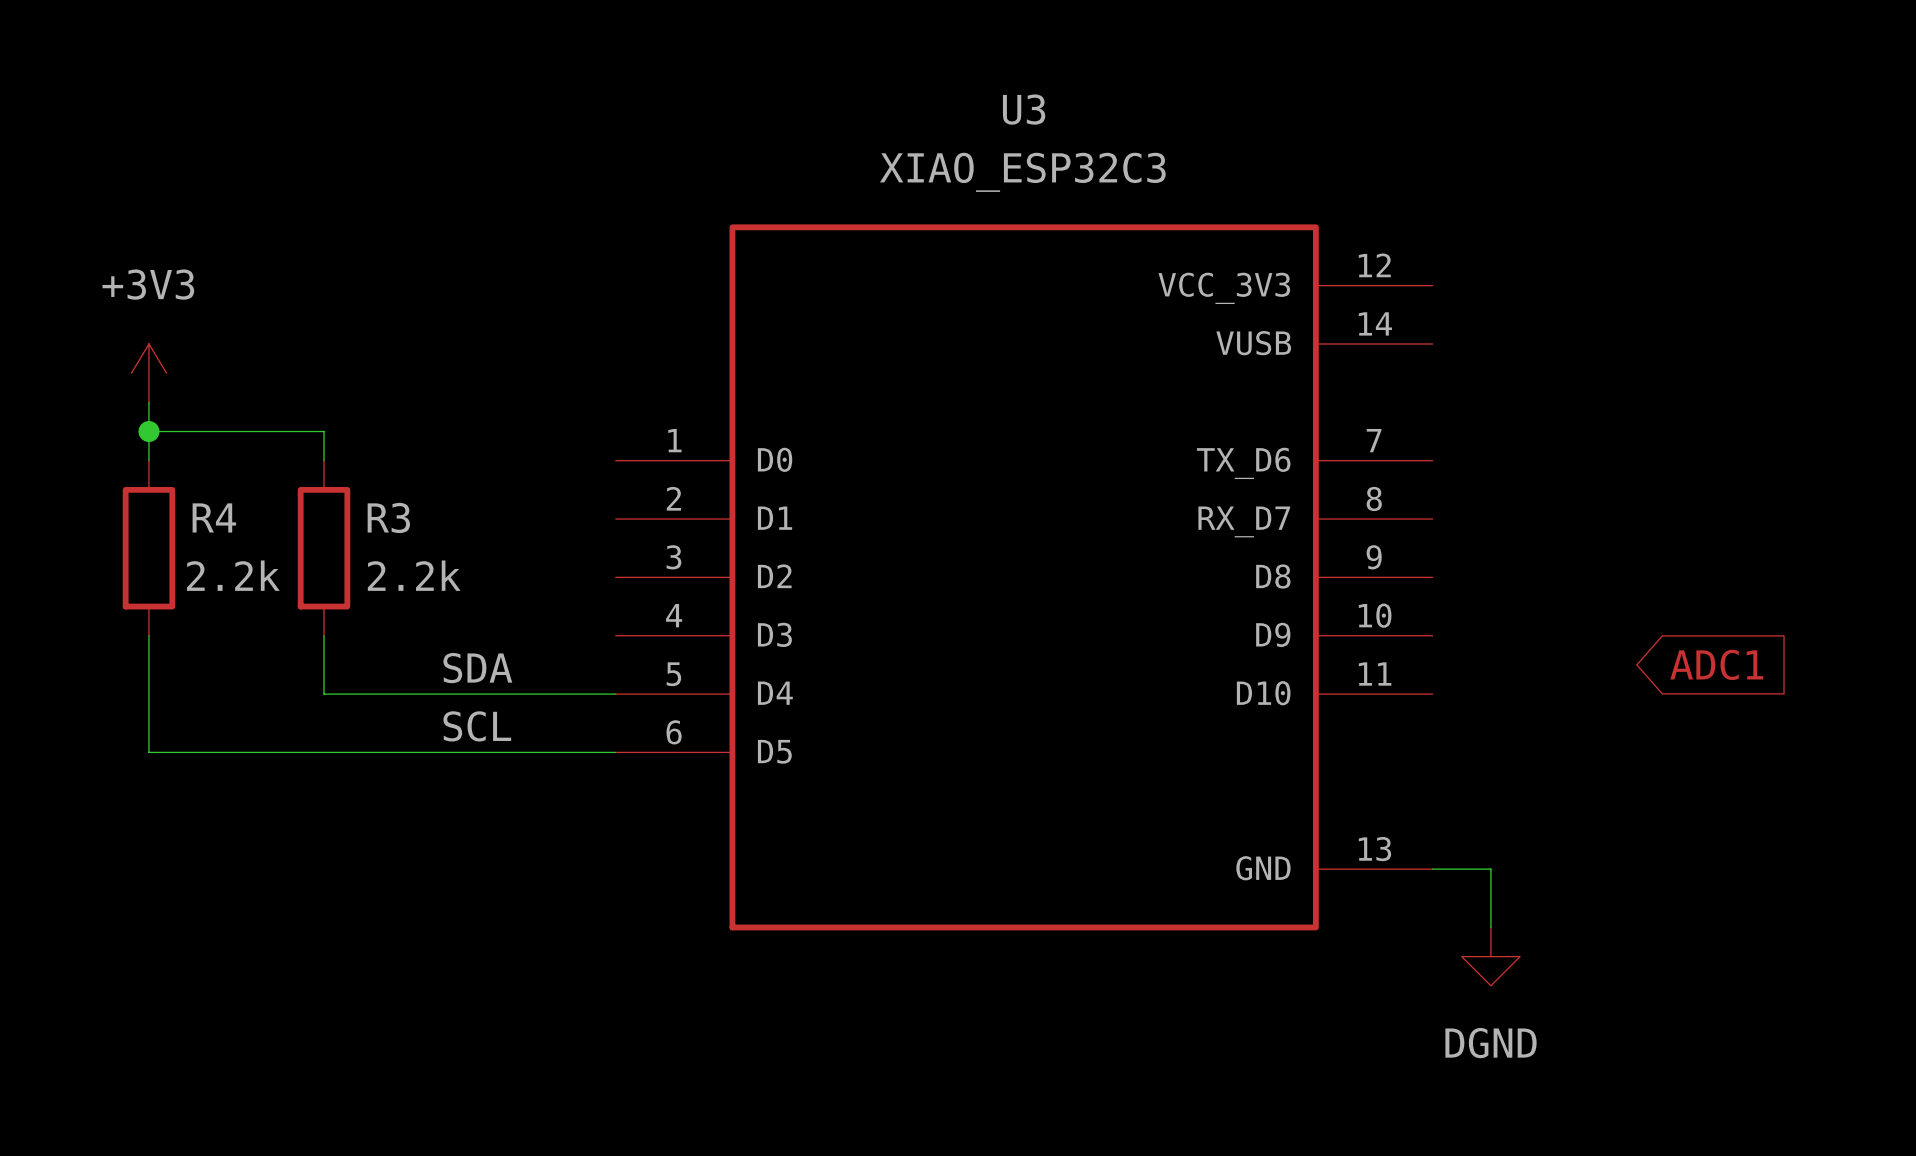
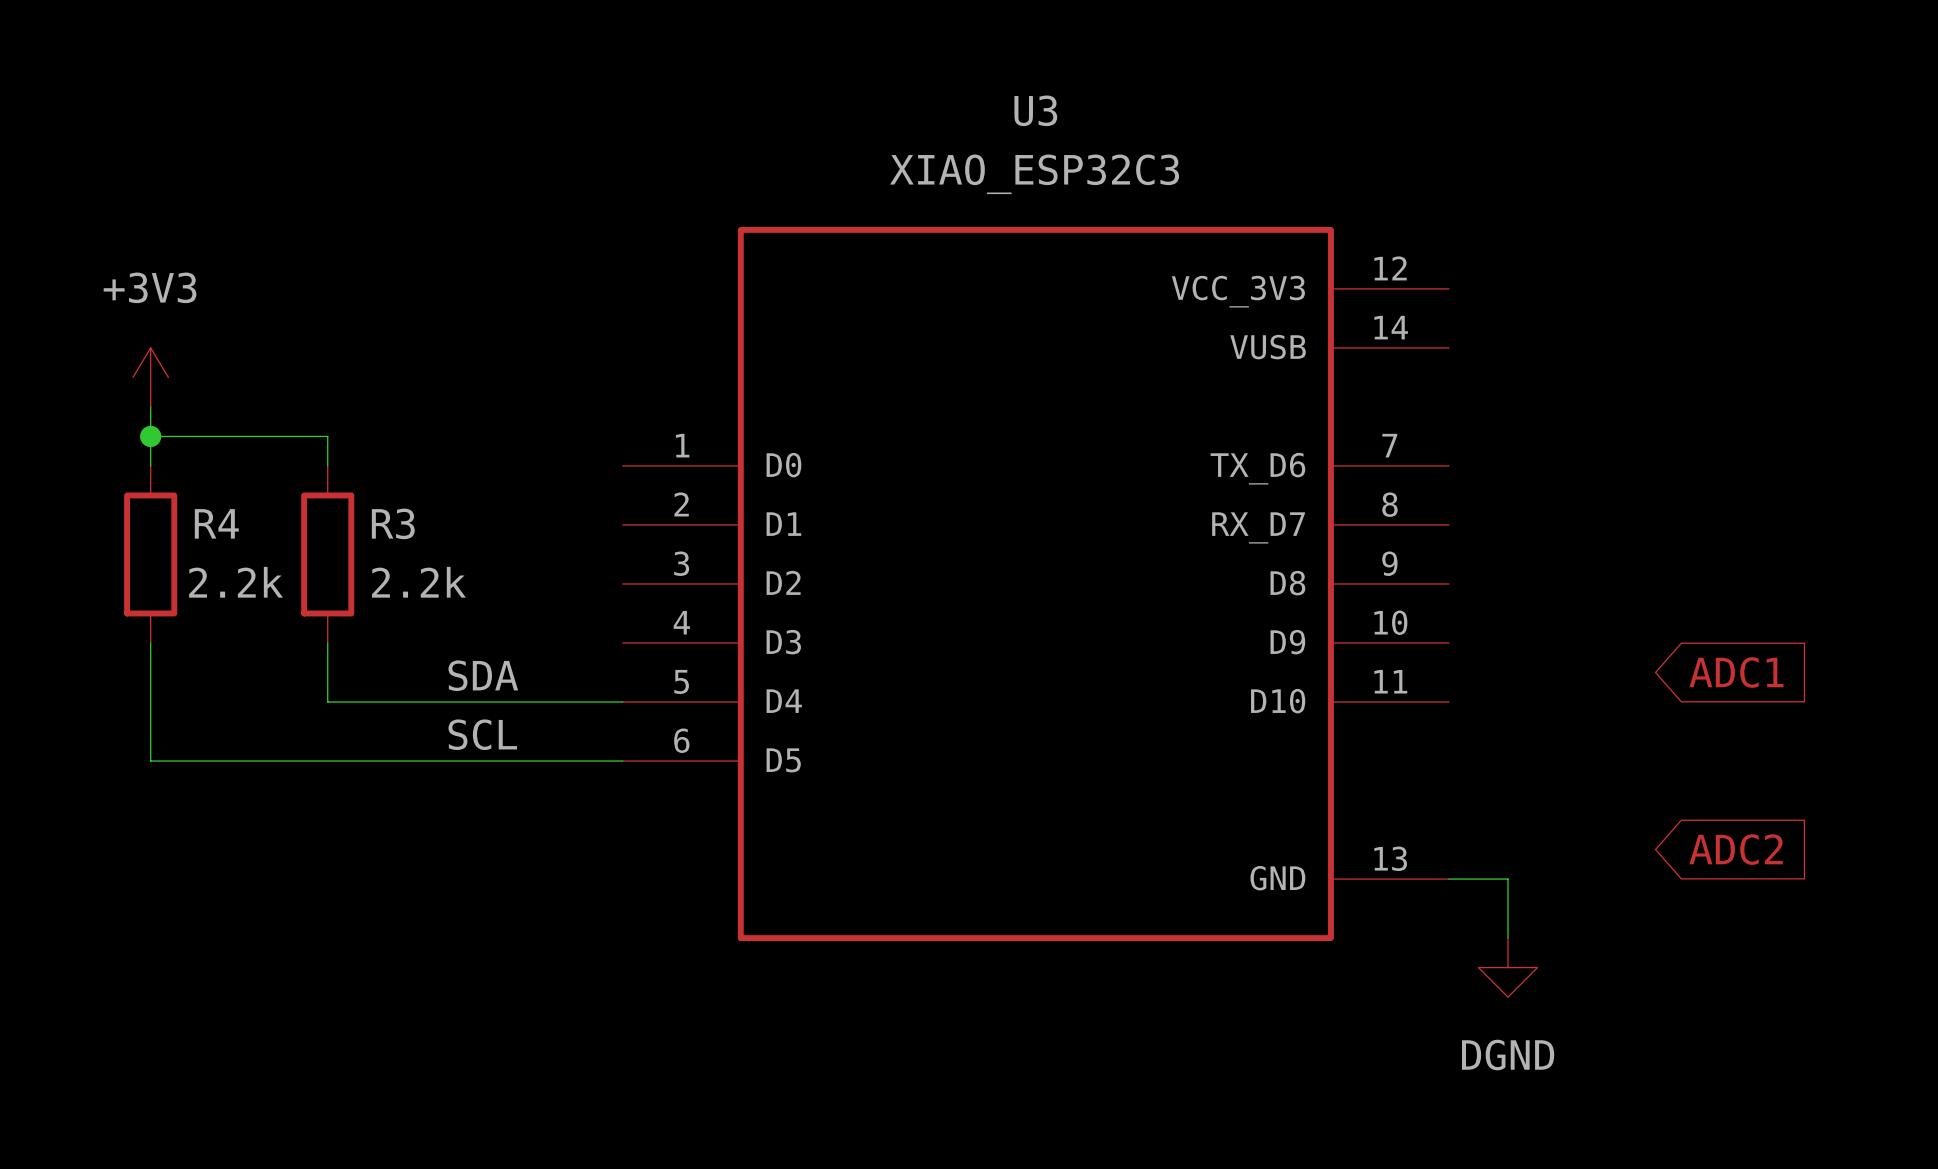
global label: none -> ADC2 (1736, 849)

